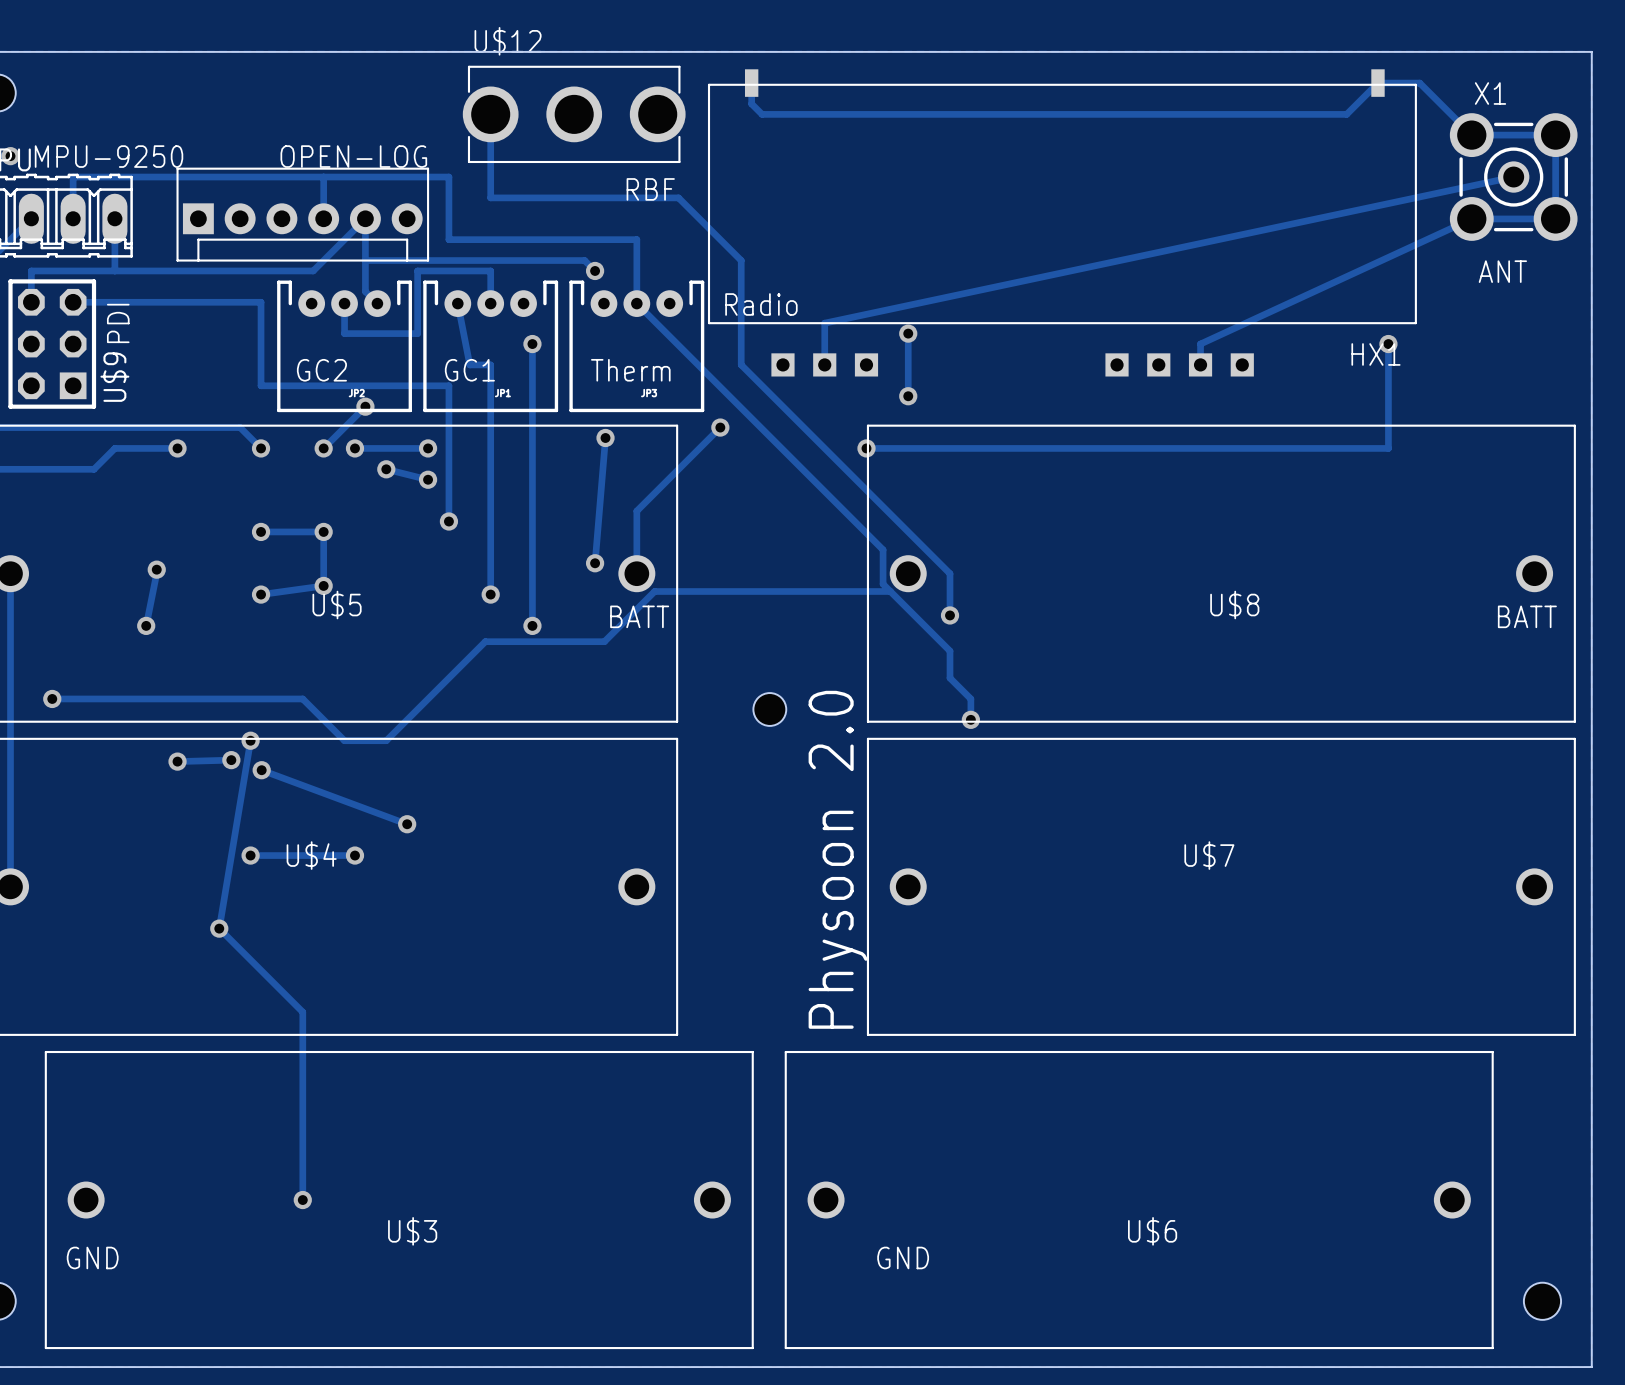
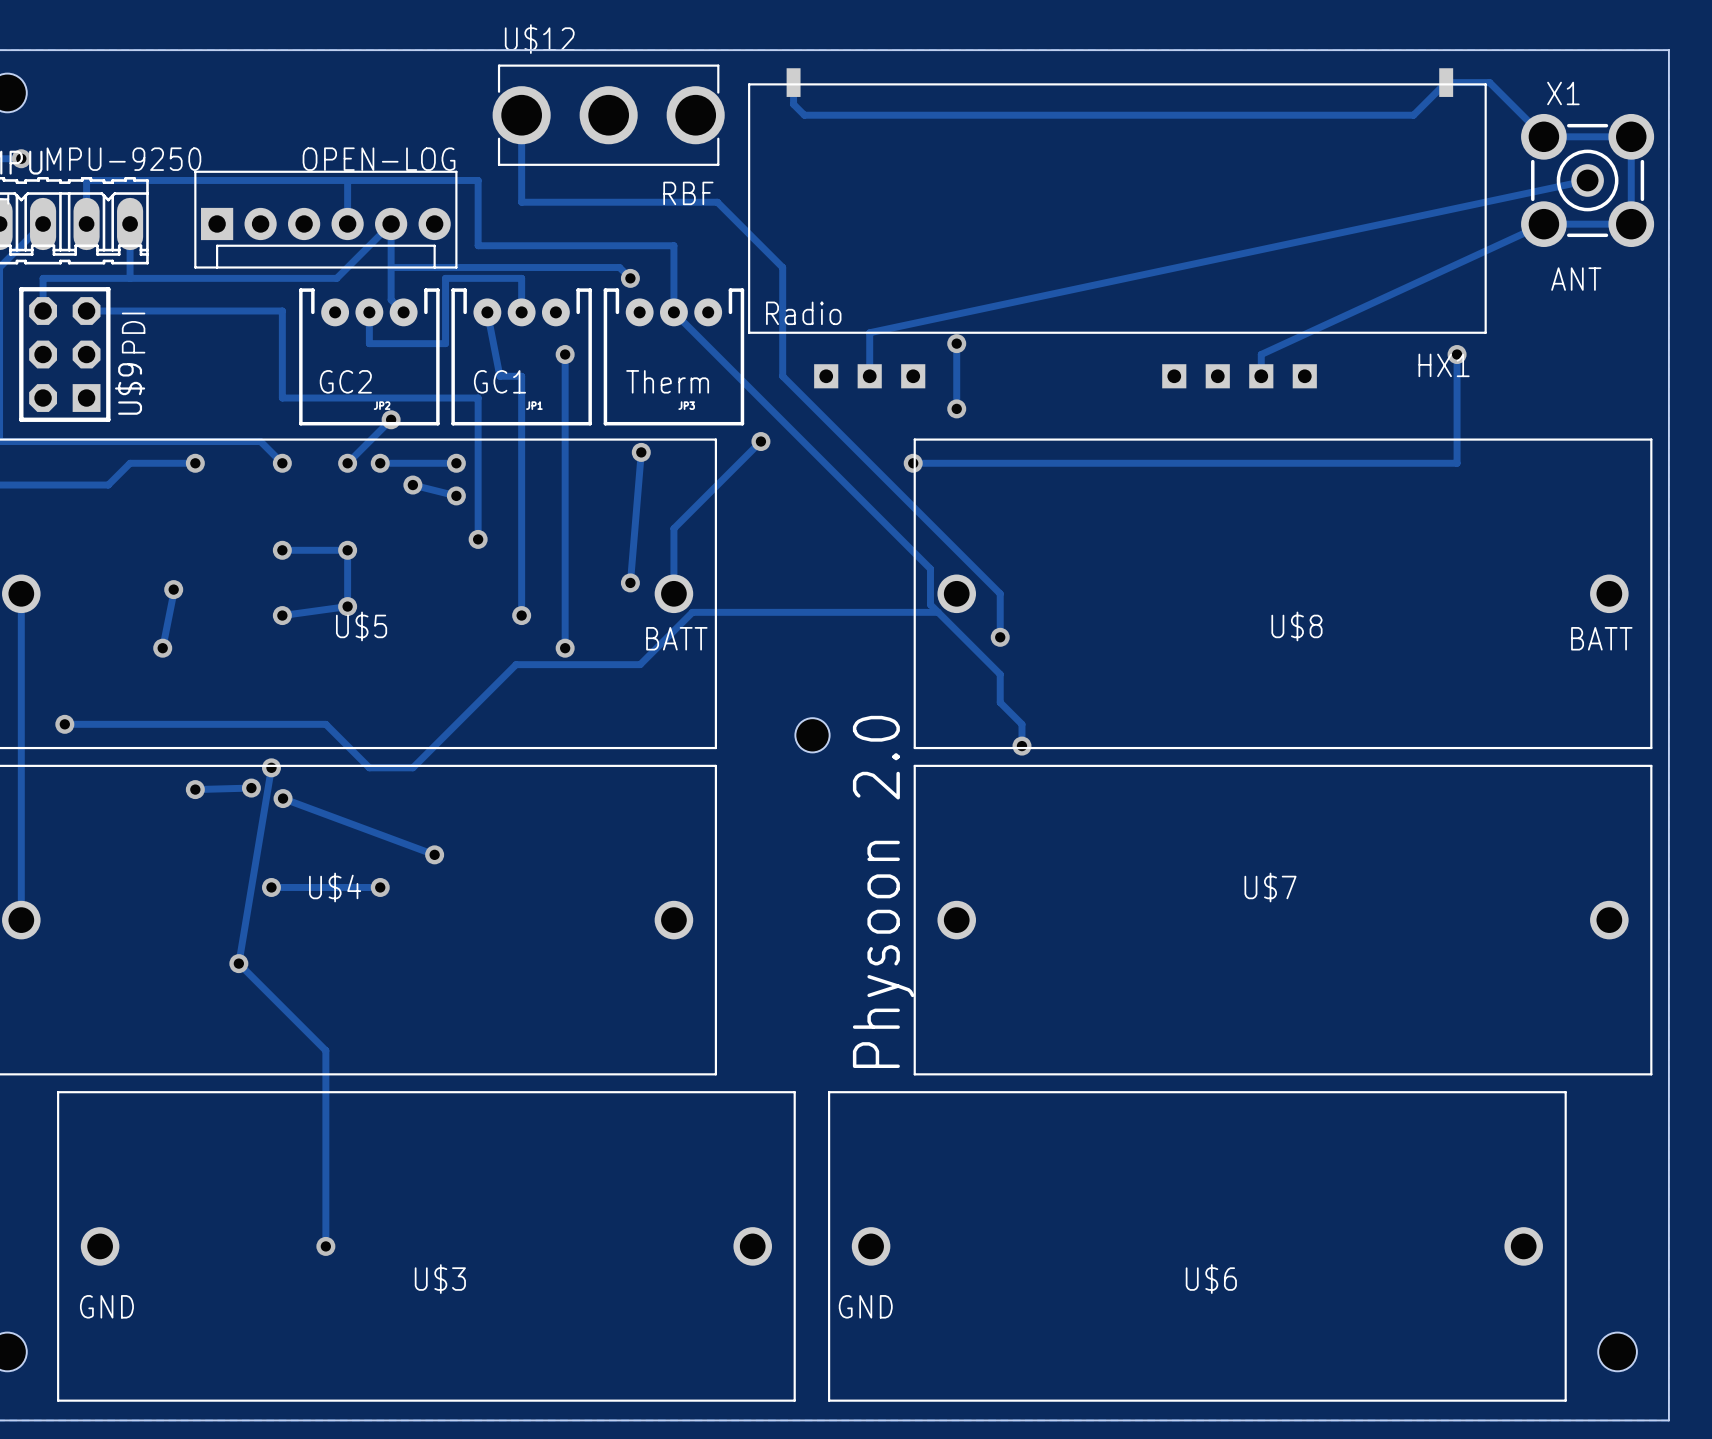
text position: GND (903, 1257) -> GND (865, 1306)

